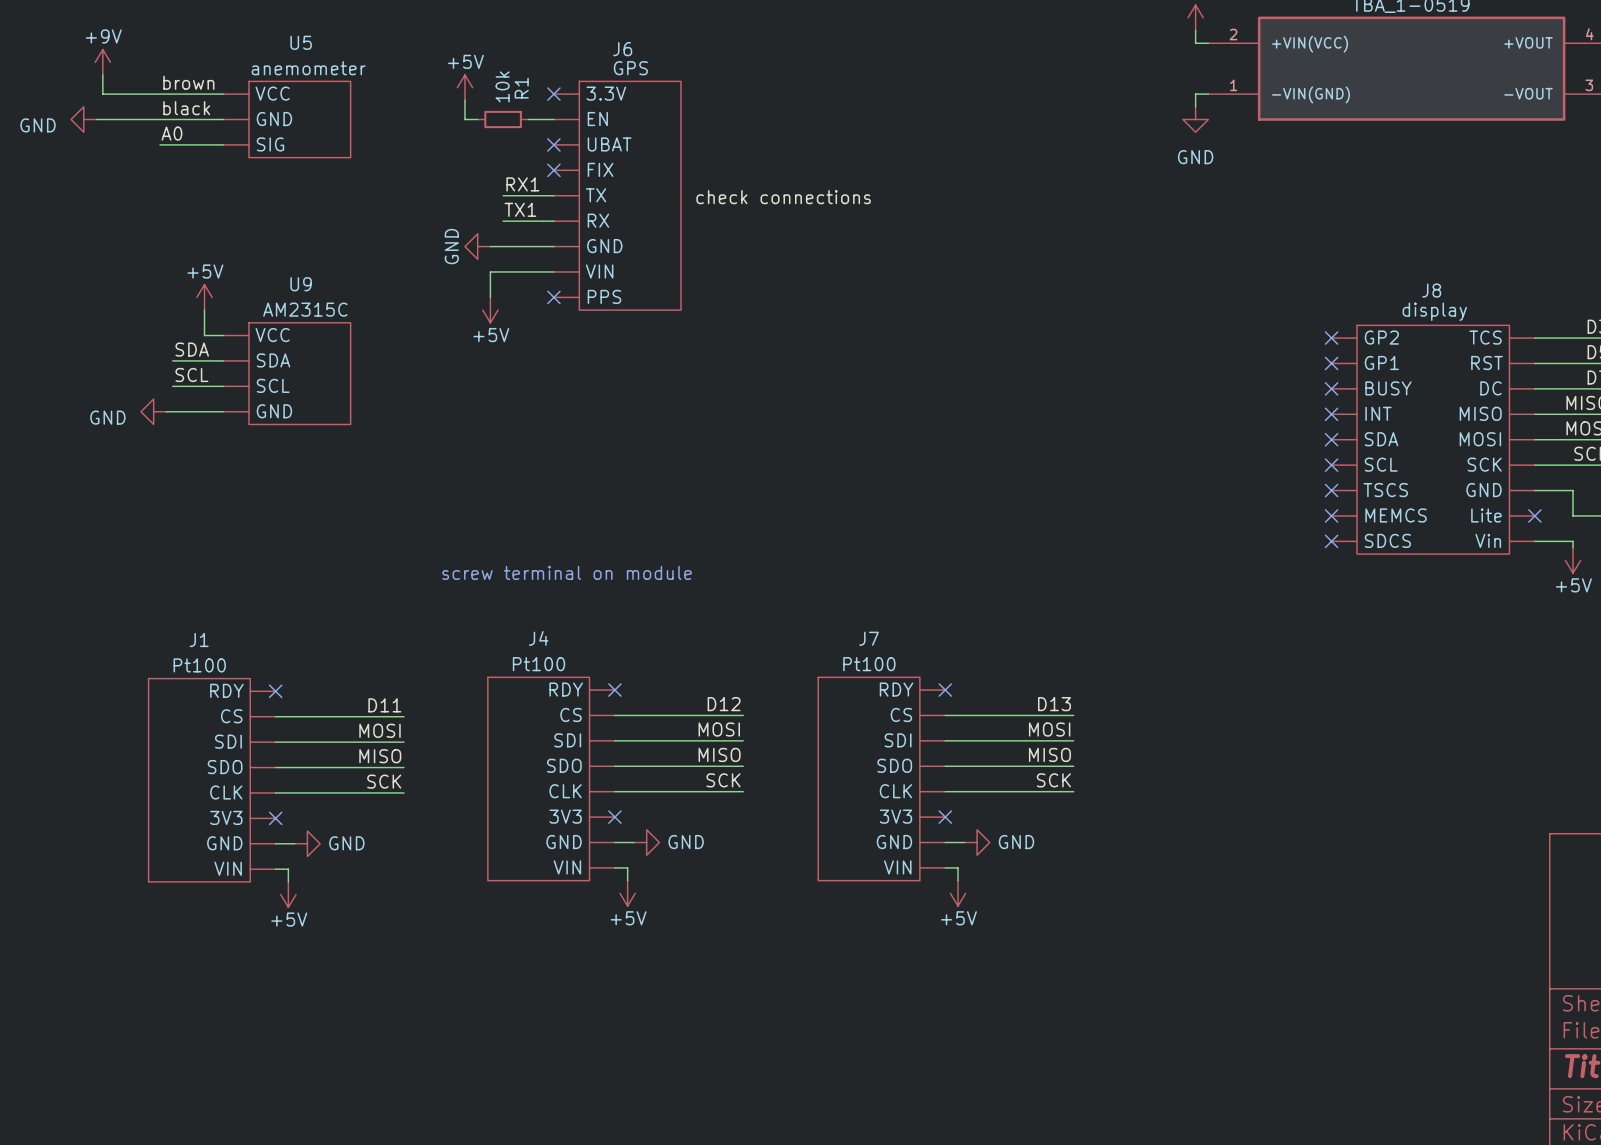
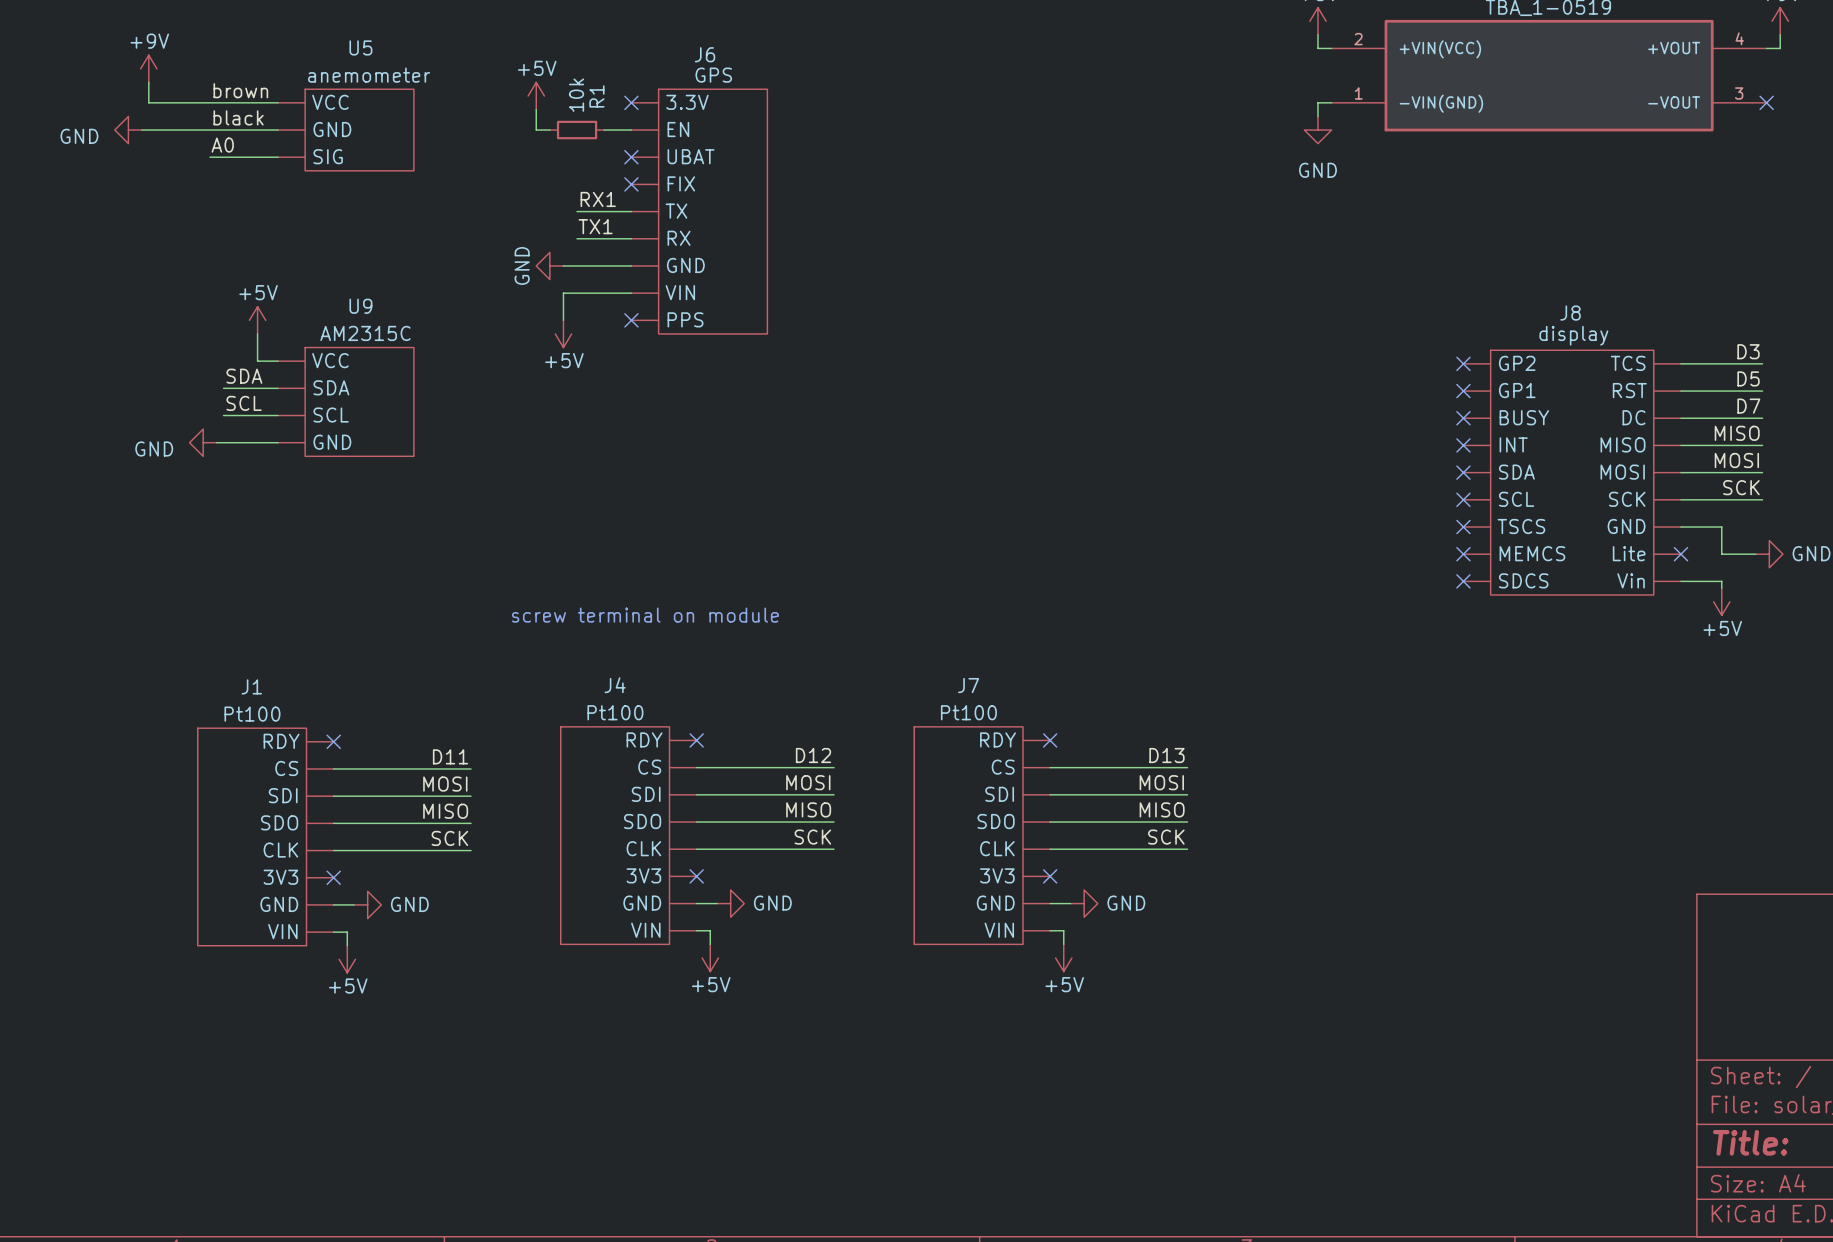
label: check connections (783, 197) -> none

